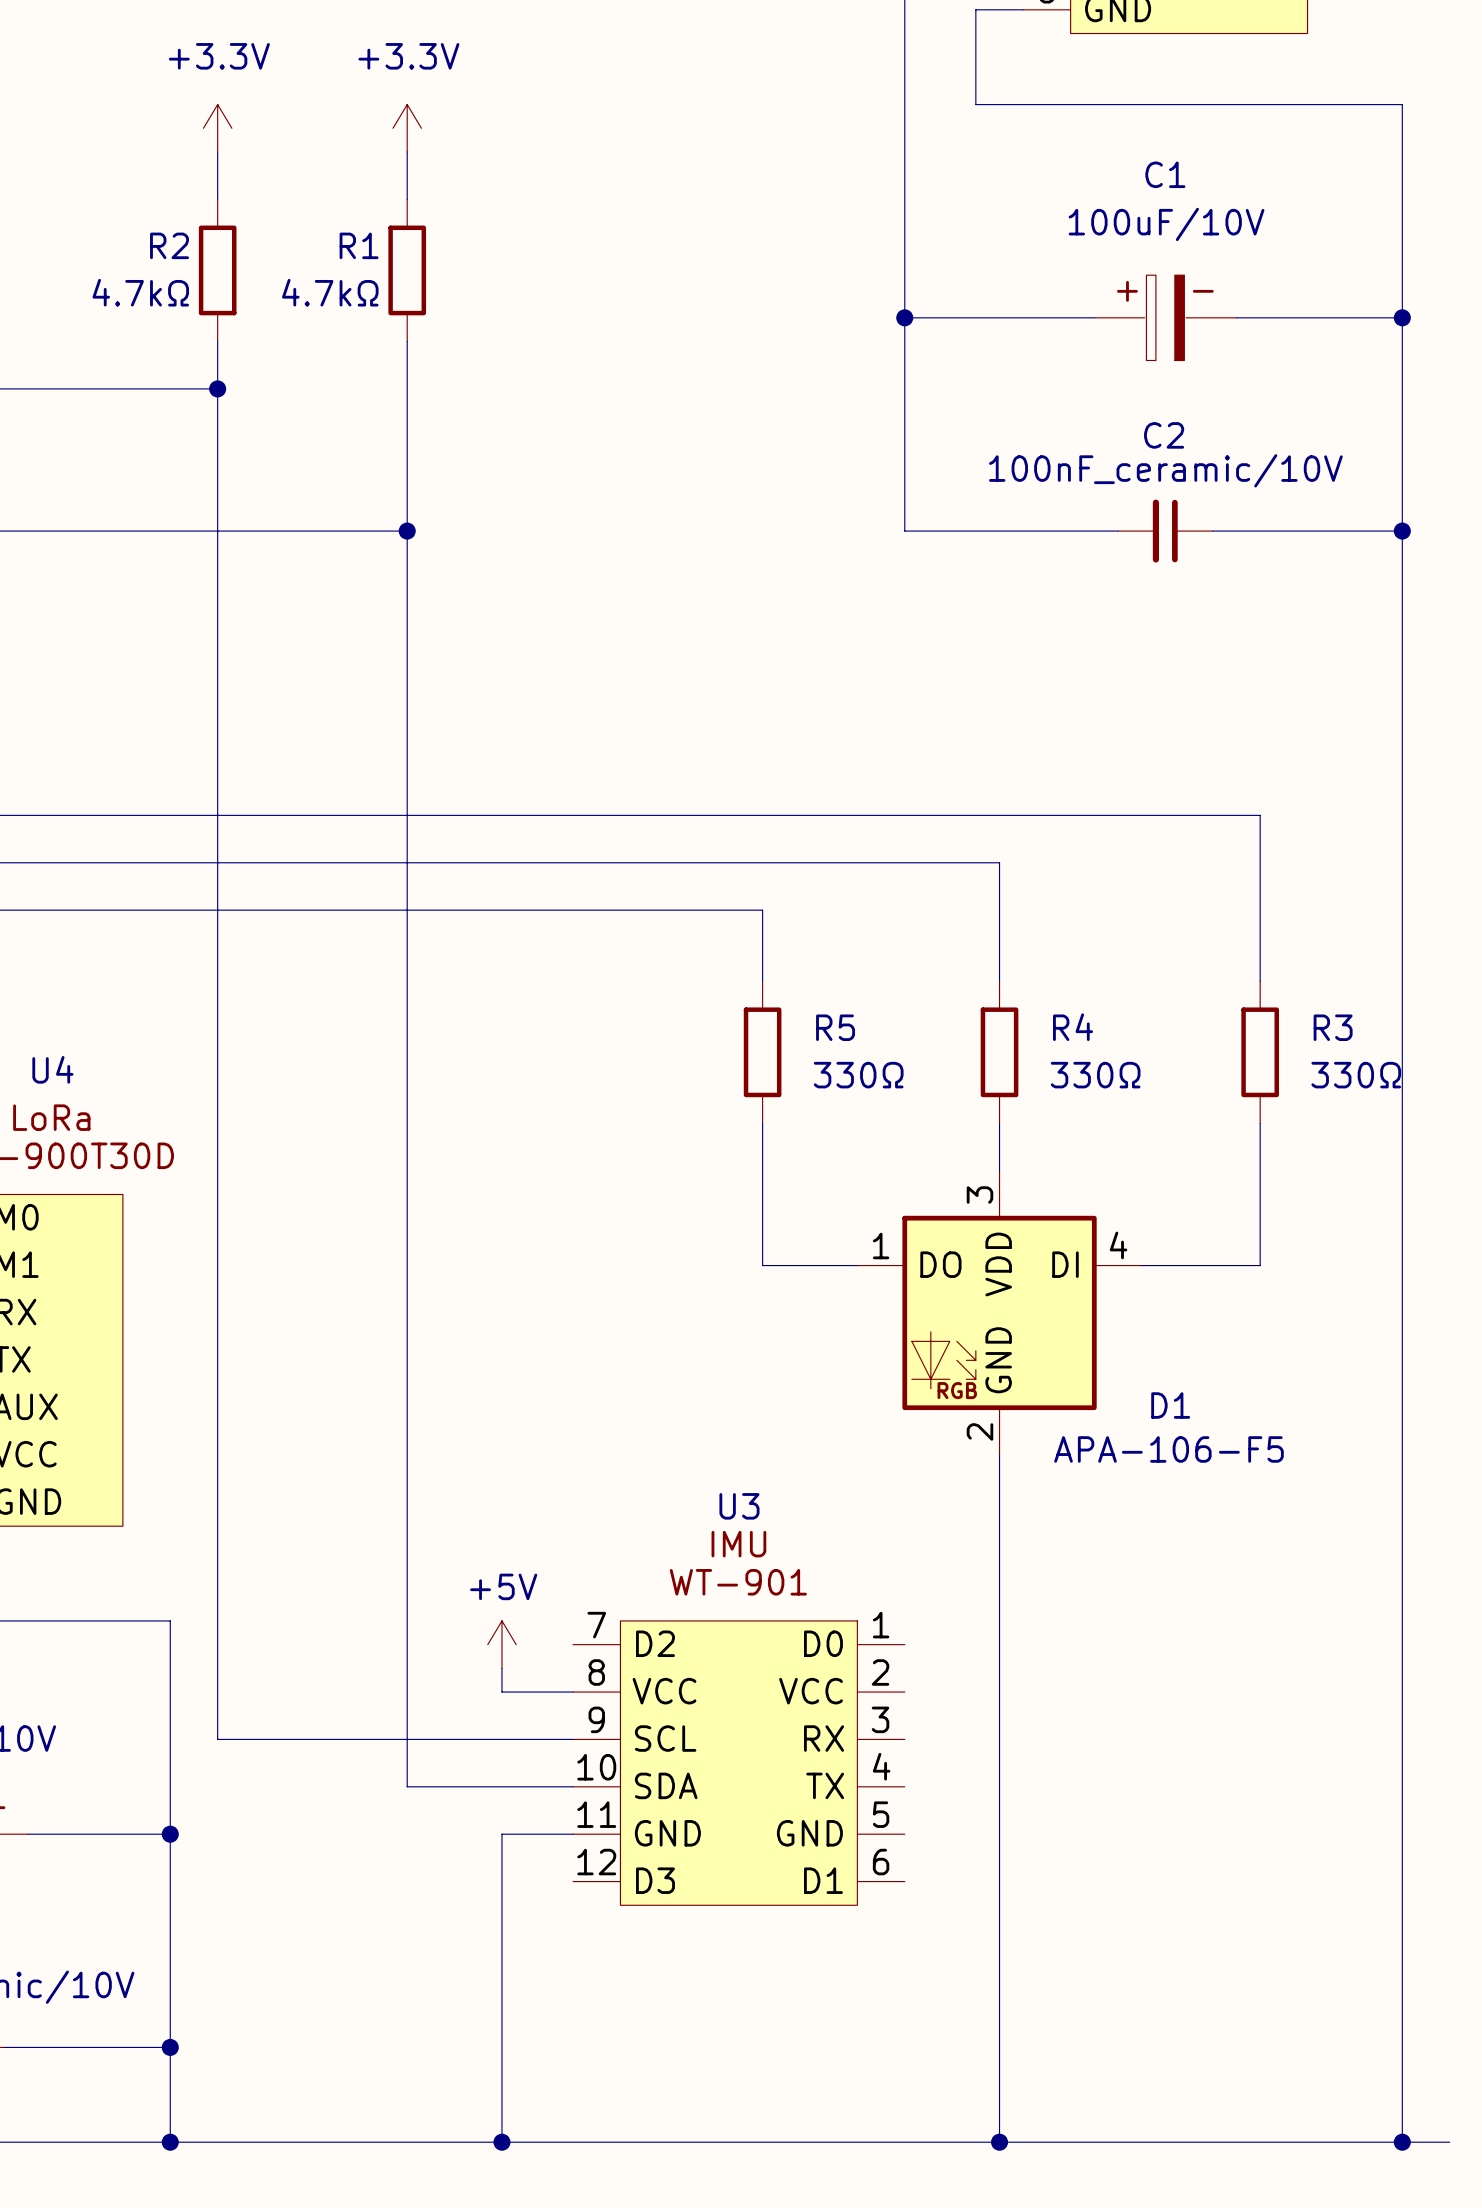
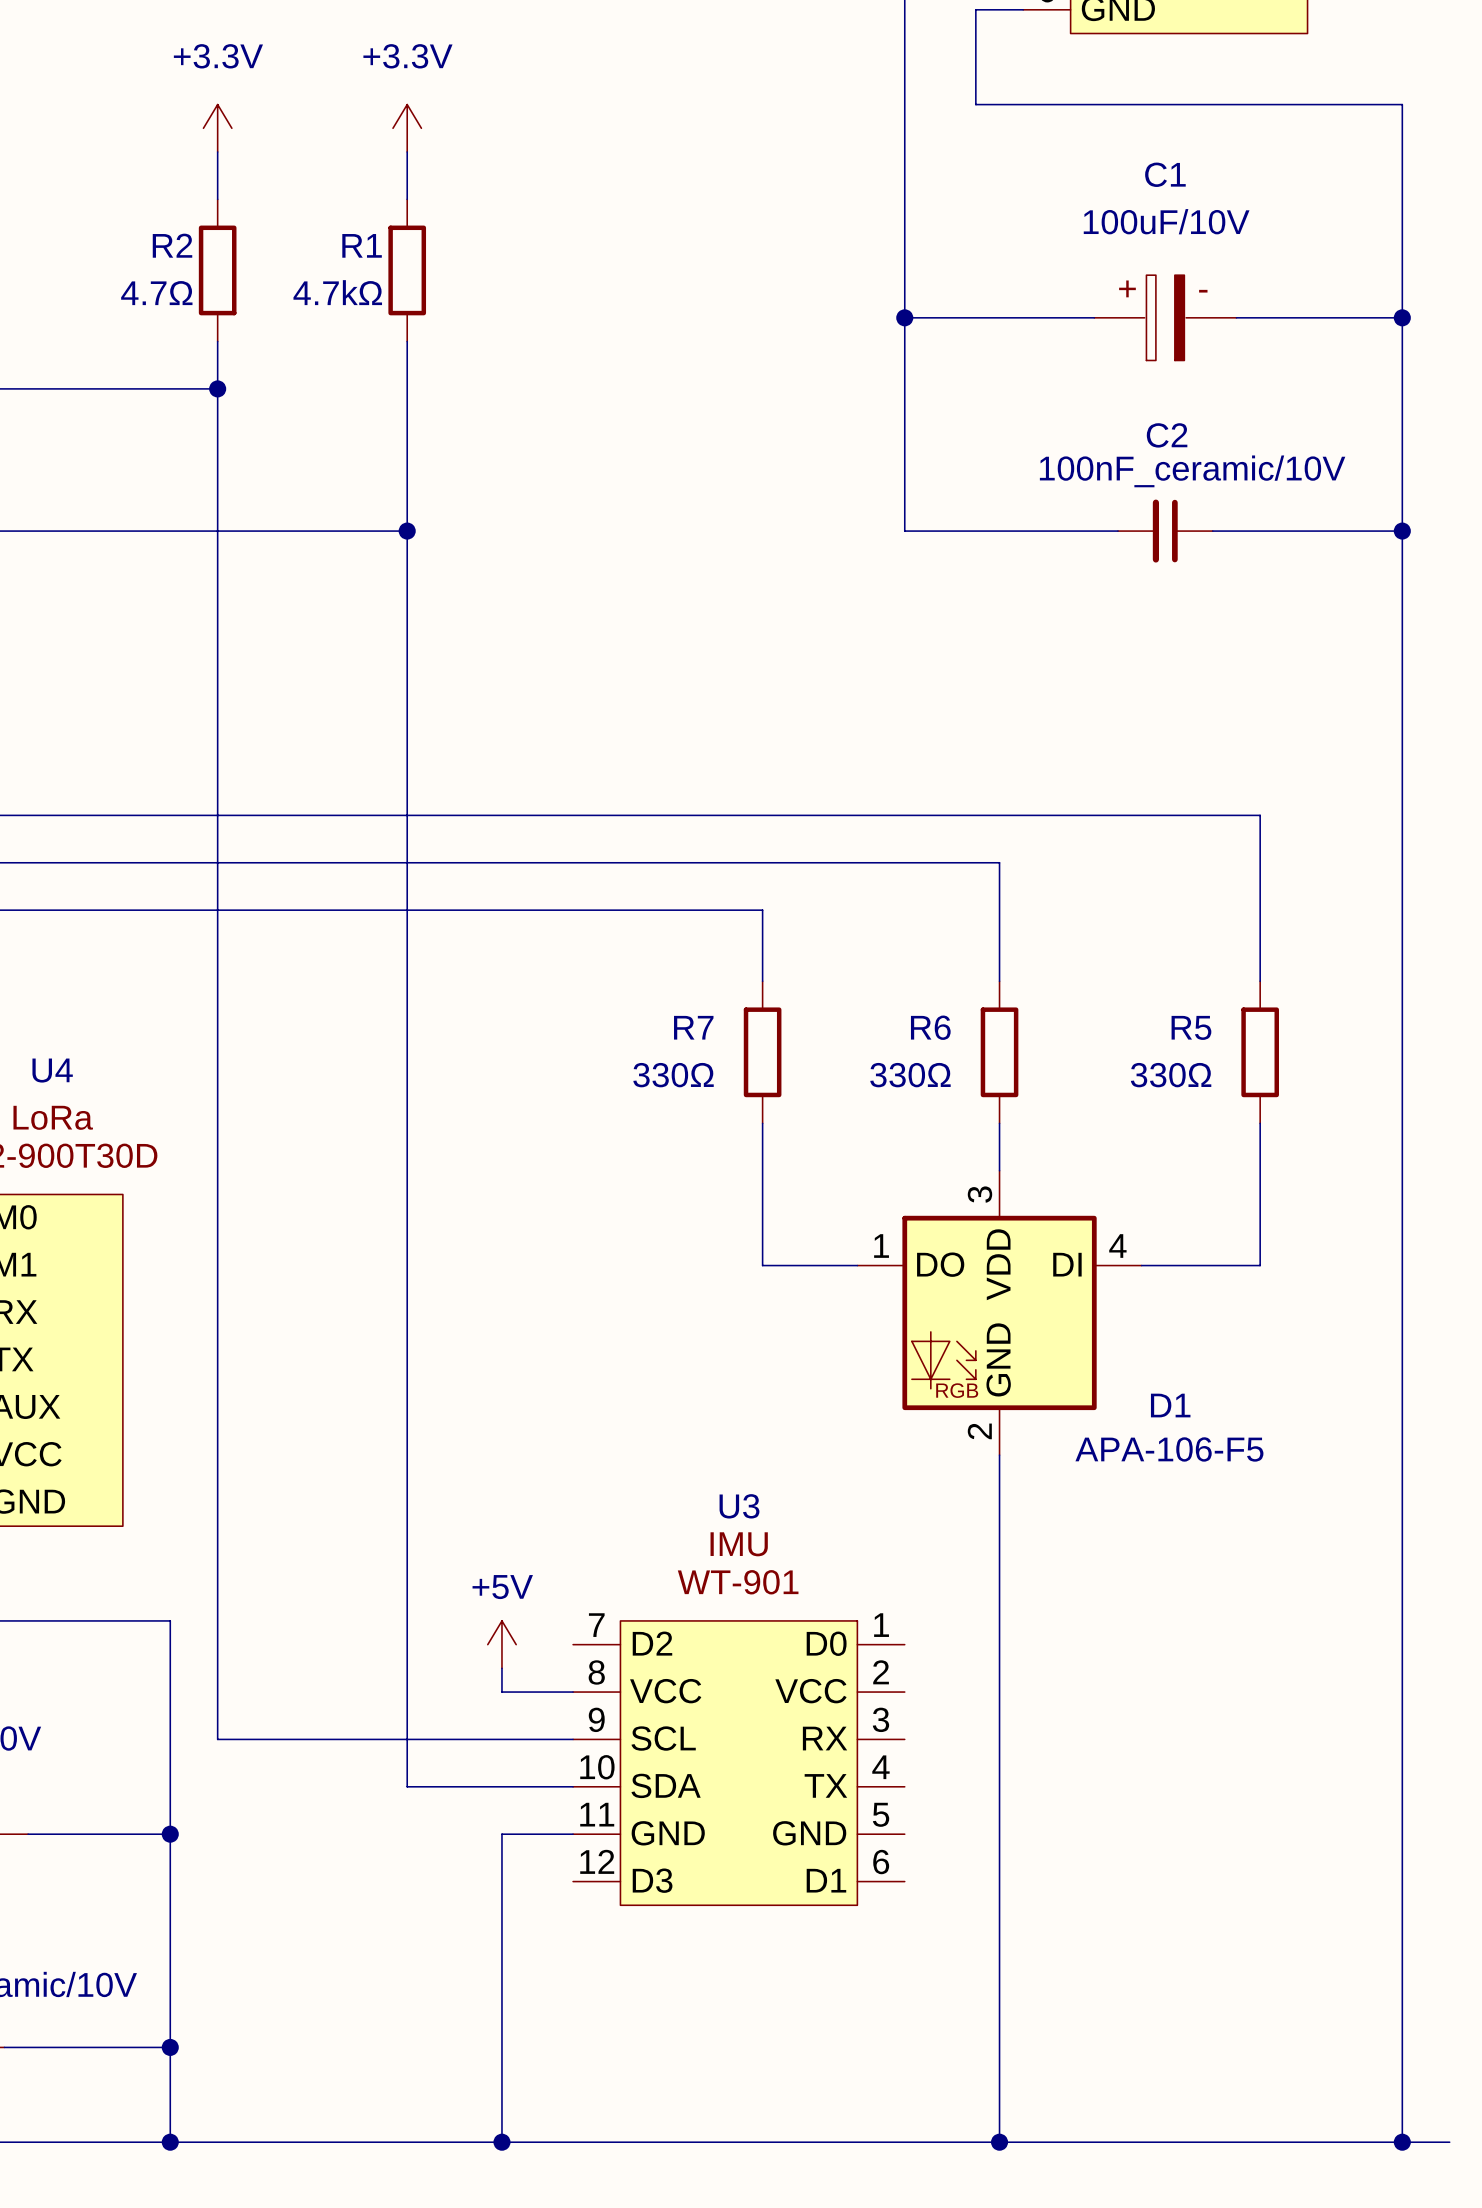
R2 value: 4.7kΩ (140, 292) -> 4.7Ω (156, 293)
R5 name: R5 (835, 1027) -> R7 (693, 1027)
R4 name: R4 (1073, 1027) -> R6 (930, 1027)
R3 name: R3 (1333, 1027) -> R5 (1191, 1027)
R5 value position: 330Ω (858, 1075) -> 330Ω (673, 1075)
R4 value position: 330Ω (1095, 1075) -> 330Ω (910, 1075)
R3 value position: 330Ω (1356, 1075) -> 330Ω (1171, 1075)

